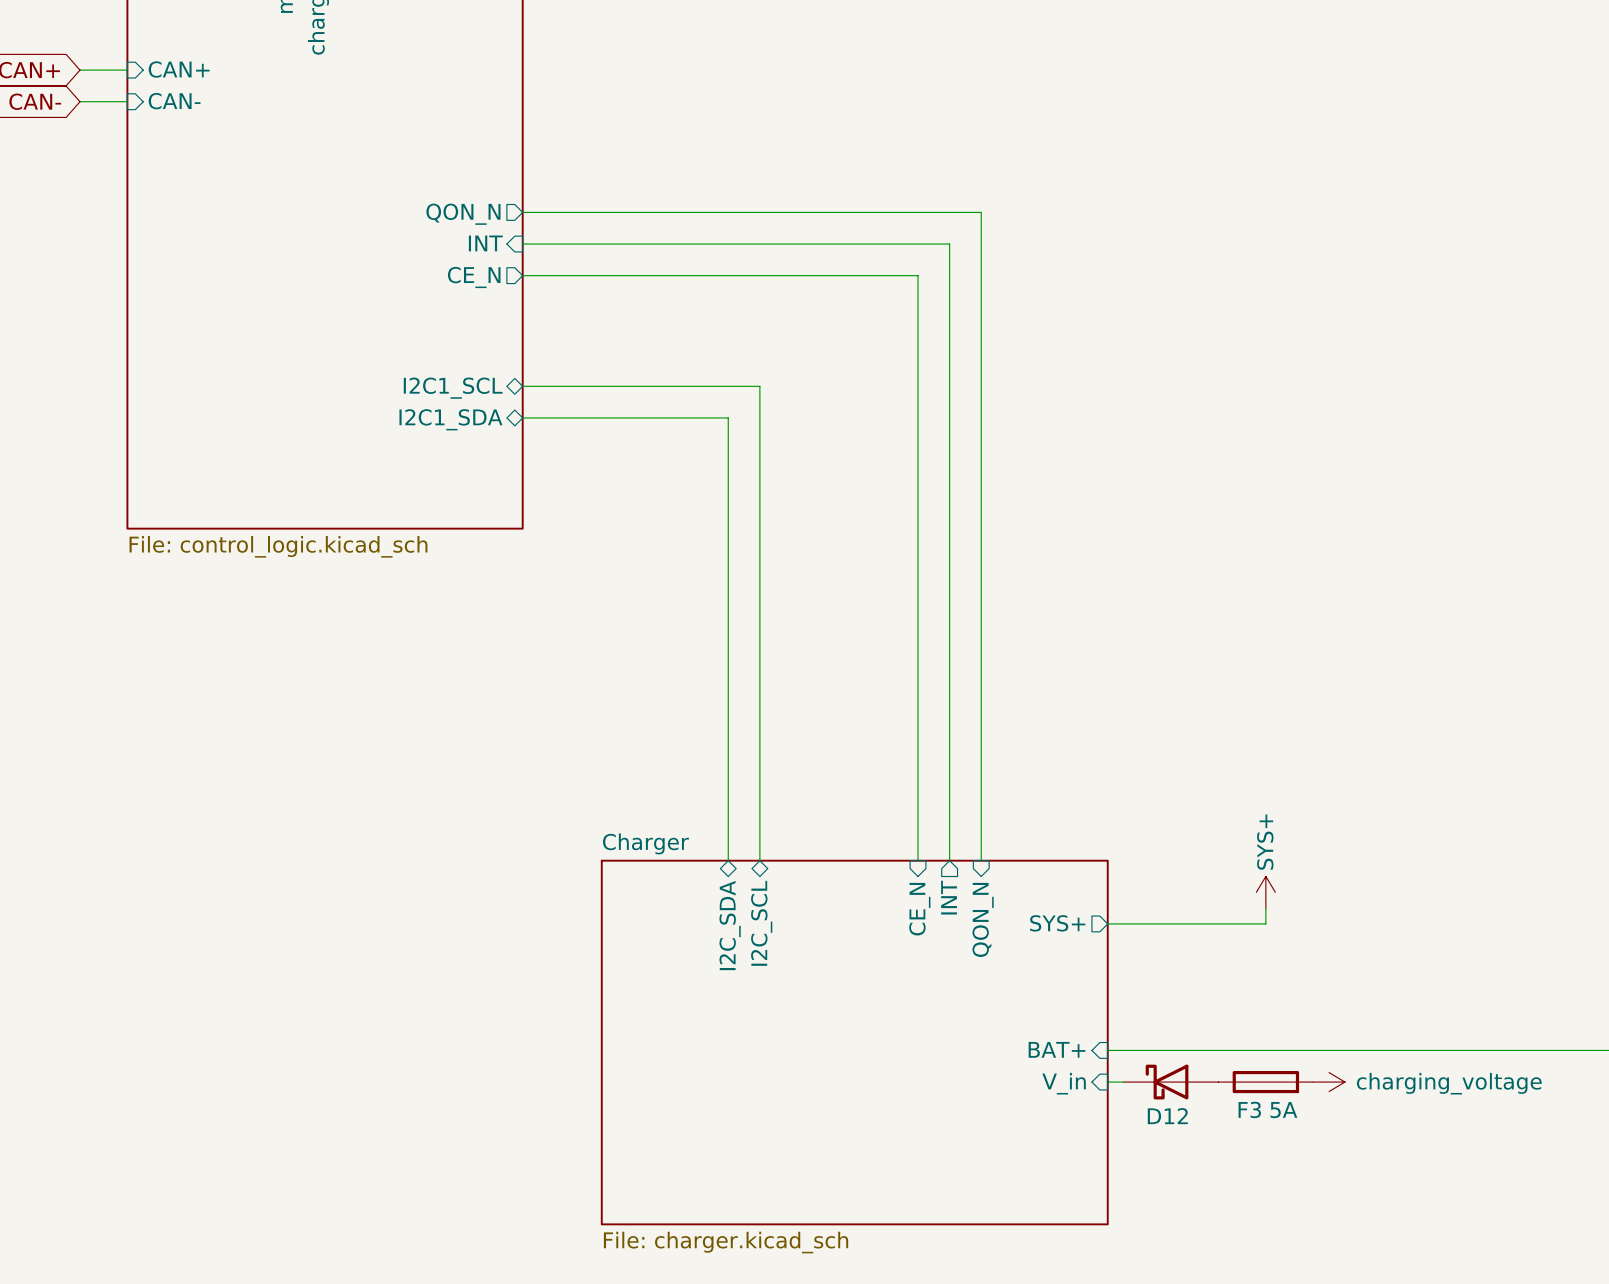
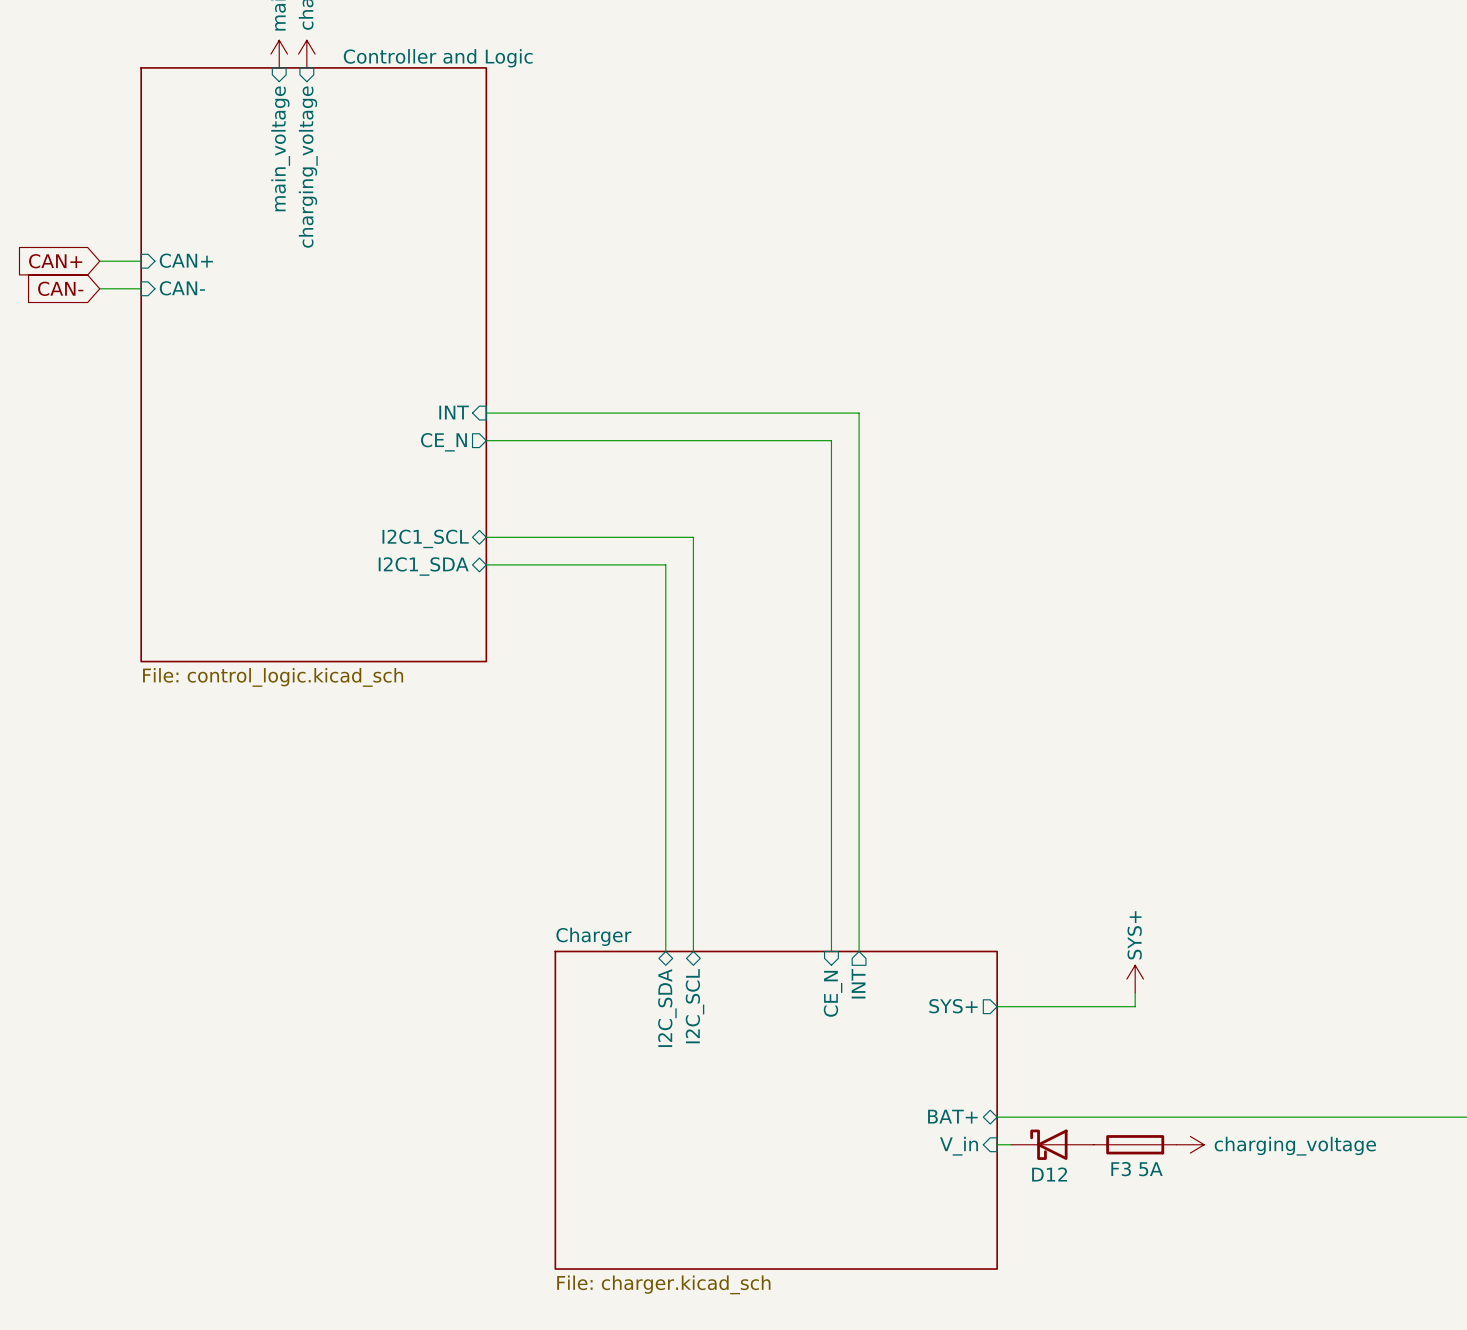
wire: (522, 212) (981, 212) (981, 860) -> none
sheet pin: QON_N (463, 214) -> none
sheet pin: QON_N (983, 919) -> none
sheet pin shape: input (1057, 1049) -> bidirectional (952, 1116)

